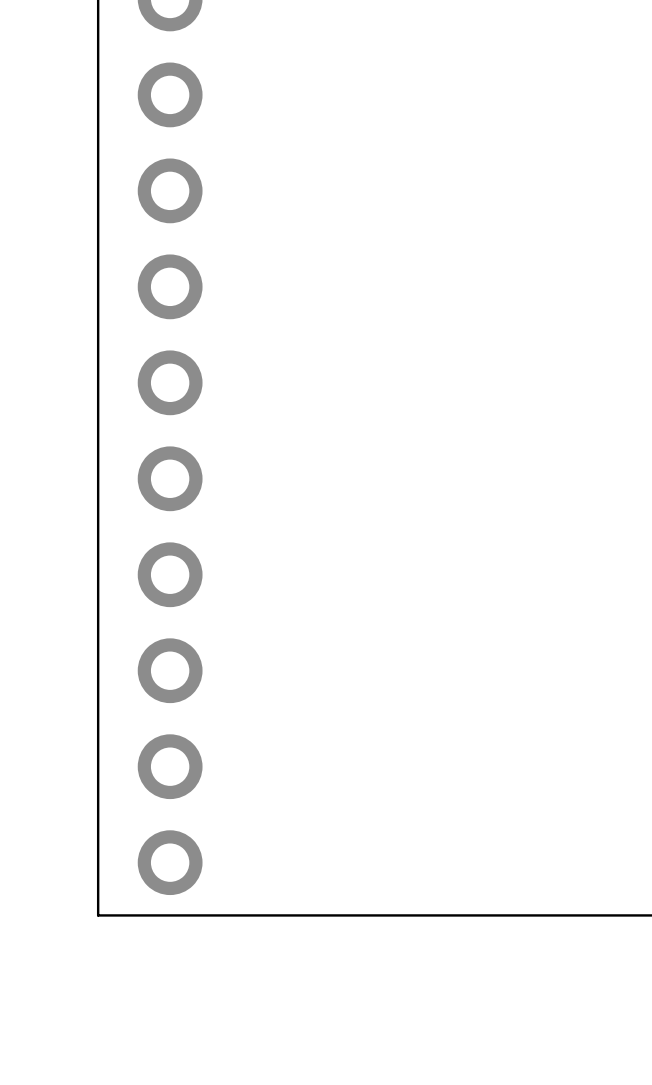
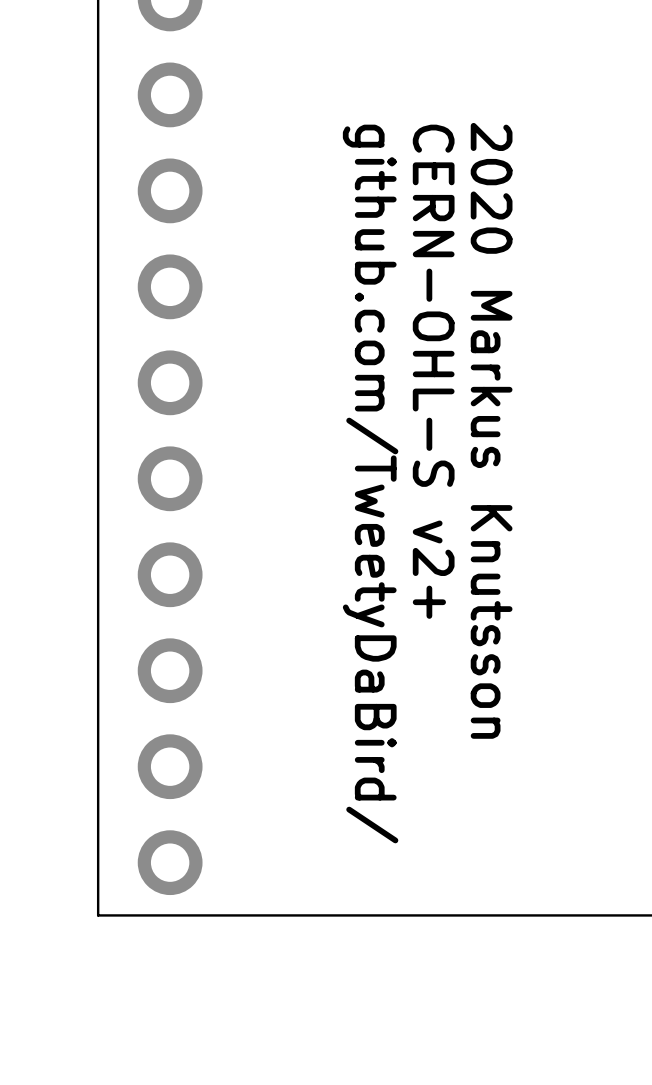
text: none -> CERN-OHL-S v2+ (433, 371)
text: none -> 2020 Markus Knutsson (491, 430)
text: none -> github.com/TweetyDaBird/ (370, 483)

